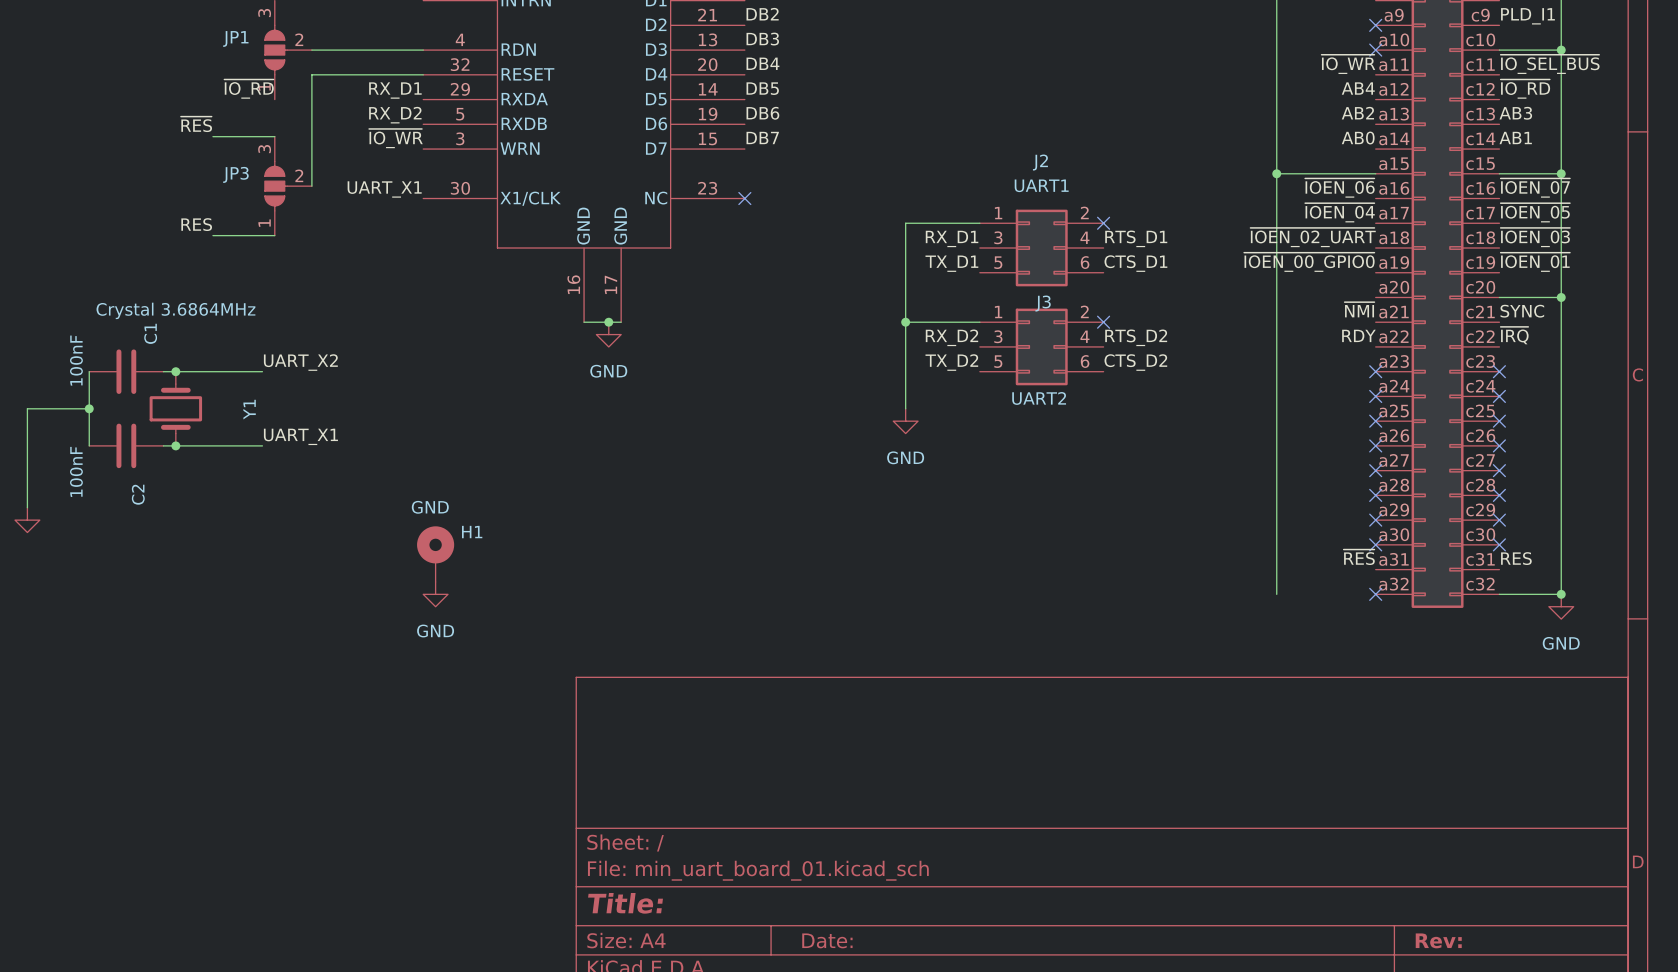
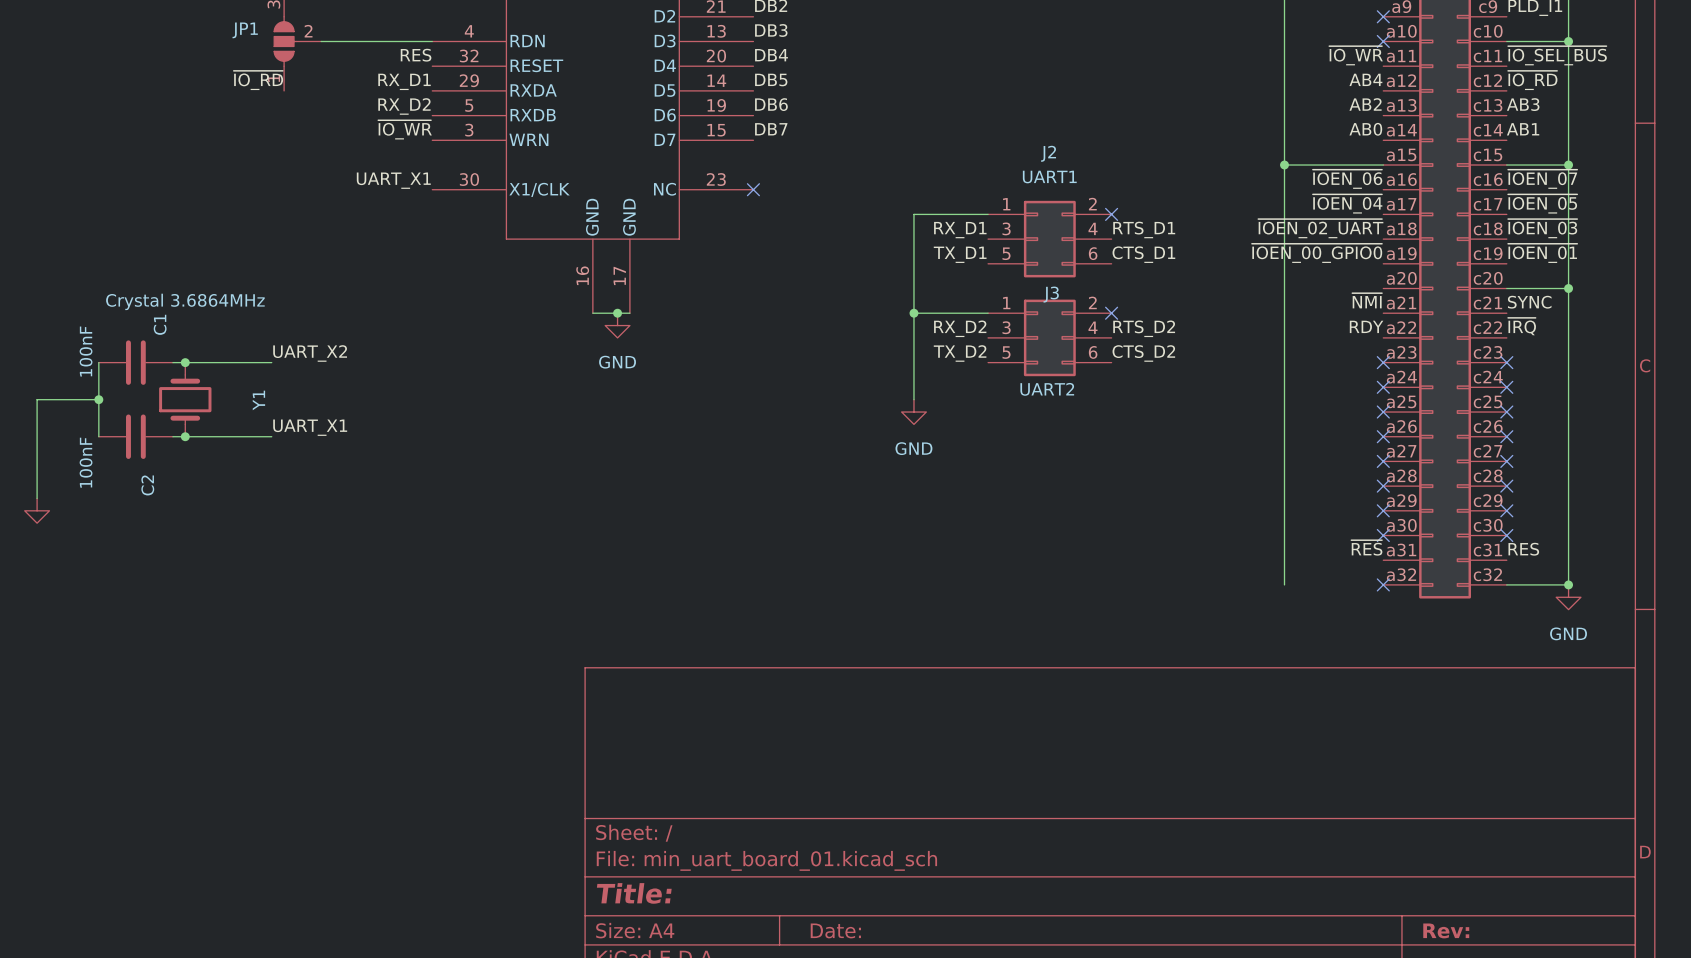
label: none -> RES (416, 55)
wire: (423, 74) (311, 74) (311, 186) -> none
label: ~{RES} (196, 124) -> none
wire: (212, 136) (274, 136) -> none
JP3: (288, 186) -> none
label: RES (196, 224) -> none
wire: (212, 235) (274, 235) -> none
H1: GND (435, 554) -> none
power symbol: GND (435, 594) -> none

